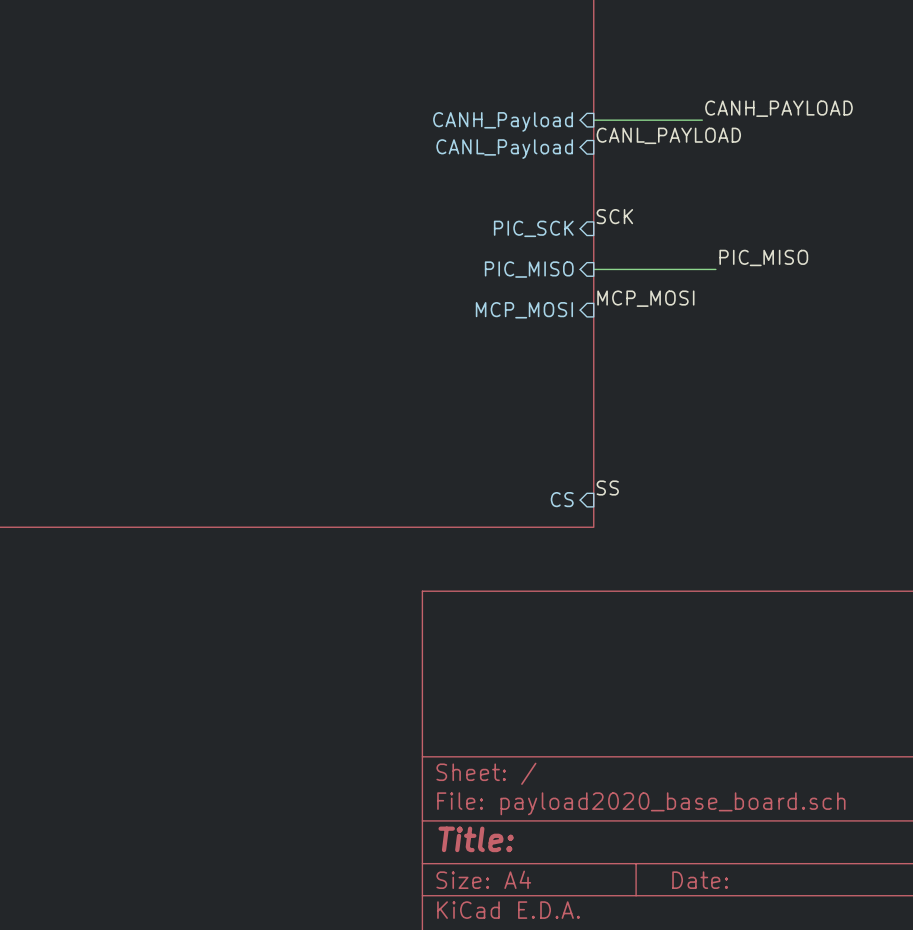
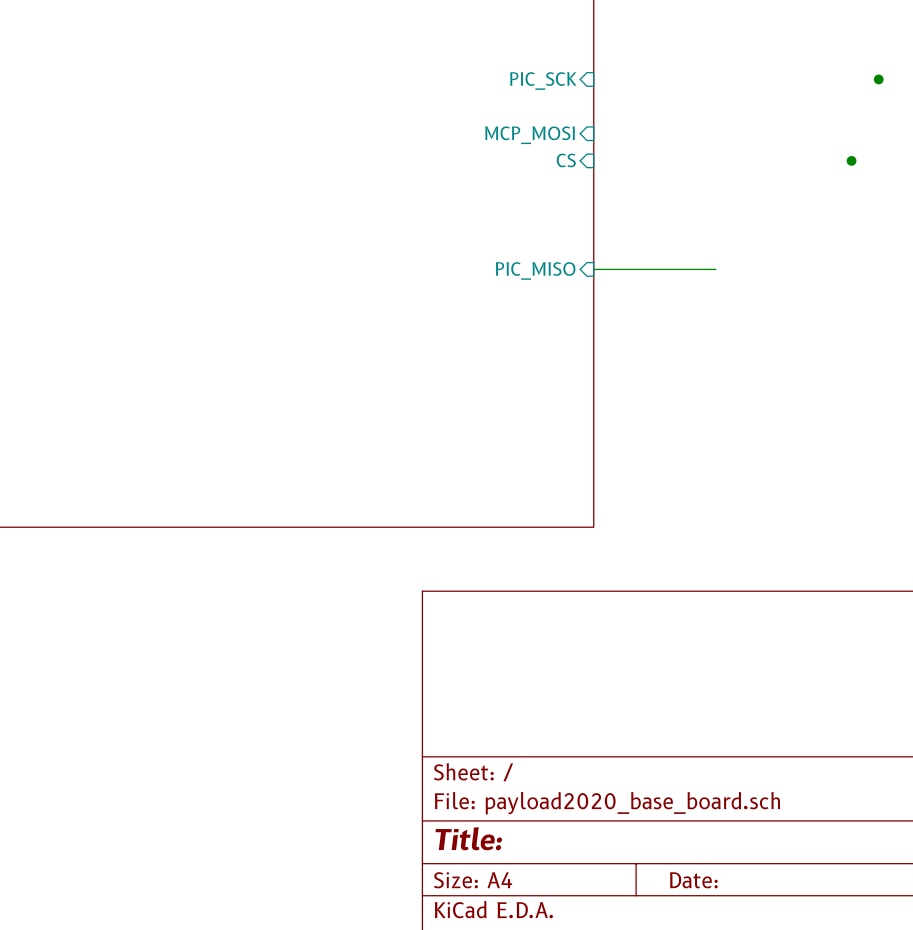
junction: none -> (878, 79)
label: CANH_PAYLOAD (778, 108) -> none
wire: (593, 120) (702, 120) -> none
sheet pin: CANH_Payload (503, 121) -> none
label: CANL_PAYLOAD (668, 135) -> none
sheet pin: CANL_Payload (504, 149) -> none
sheet pin: none -> CS (566, 160)
junction: none -> (851, 160)
label: SCK (614, 216) -> none
sheet pin position: PIC_SCK (533, 228) -> PIC_SCK (543, 80)
label: PIC_MISO (763, 257) -> none
label: MCP_MOSI (645, 298) -> none
sheet pin position: MCP_MOSI (524, 310) -> MCP_MOSI (529, 135)
label: SS (607, 488) -> none
sheet pin: CS (562, 499) -> none

